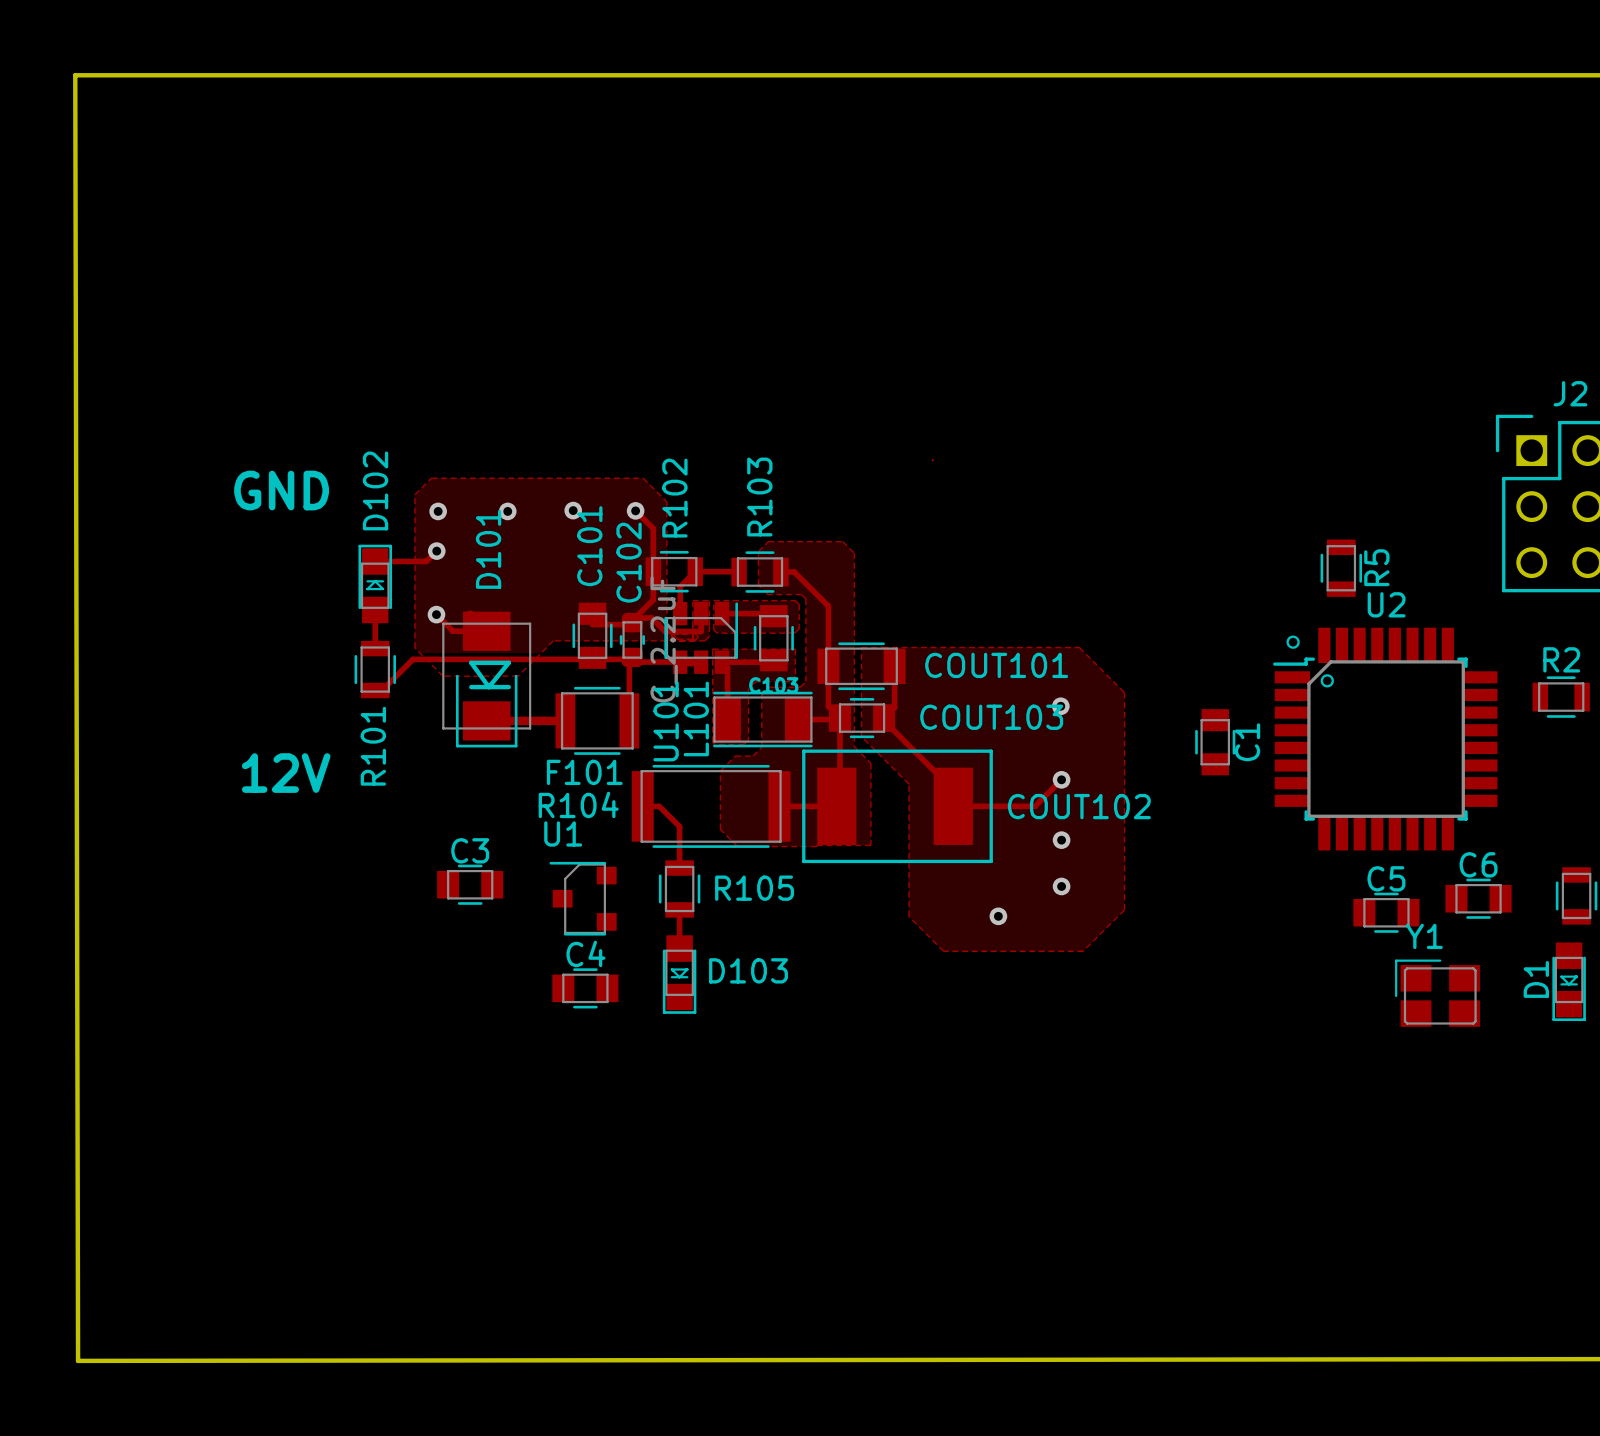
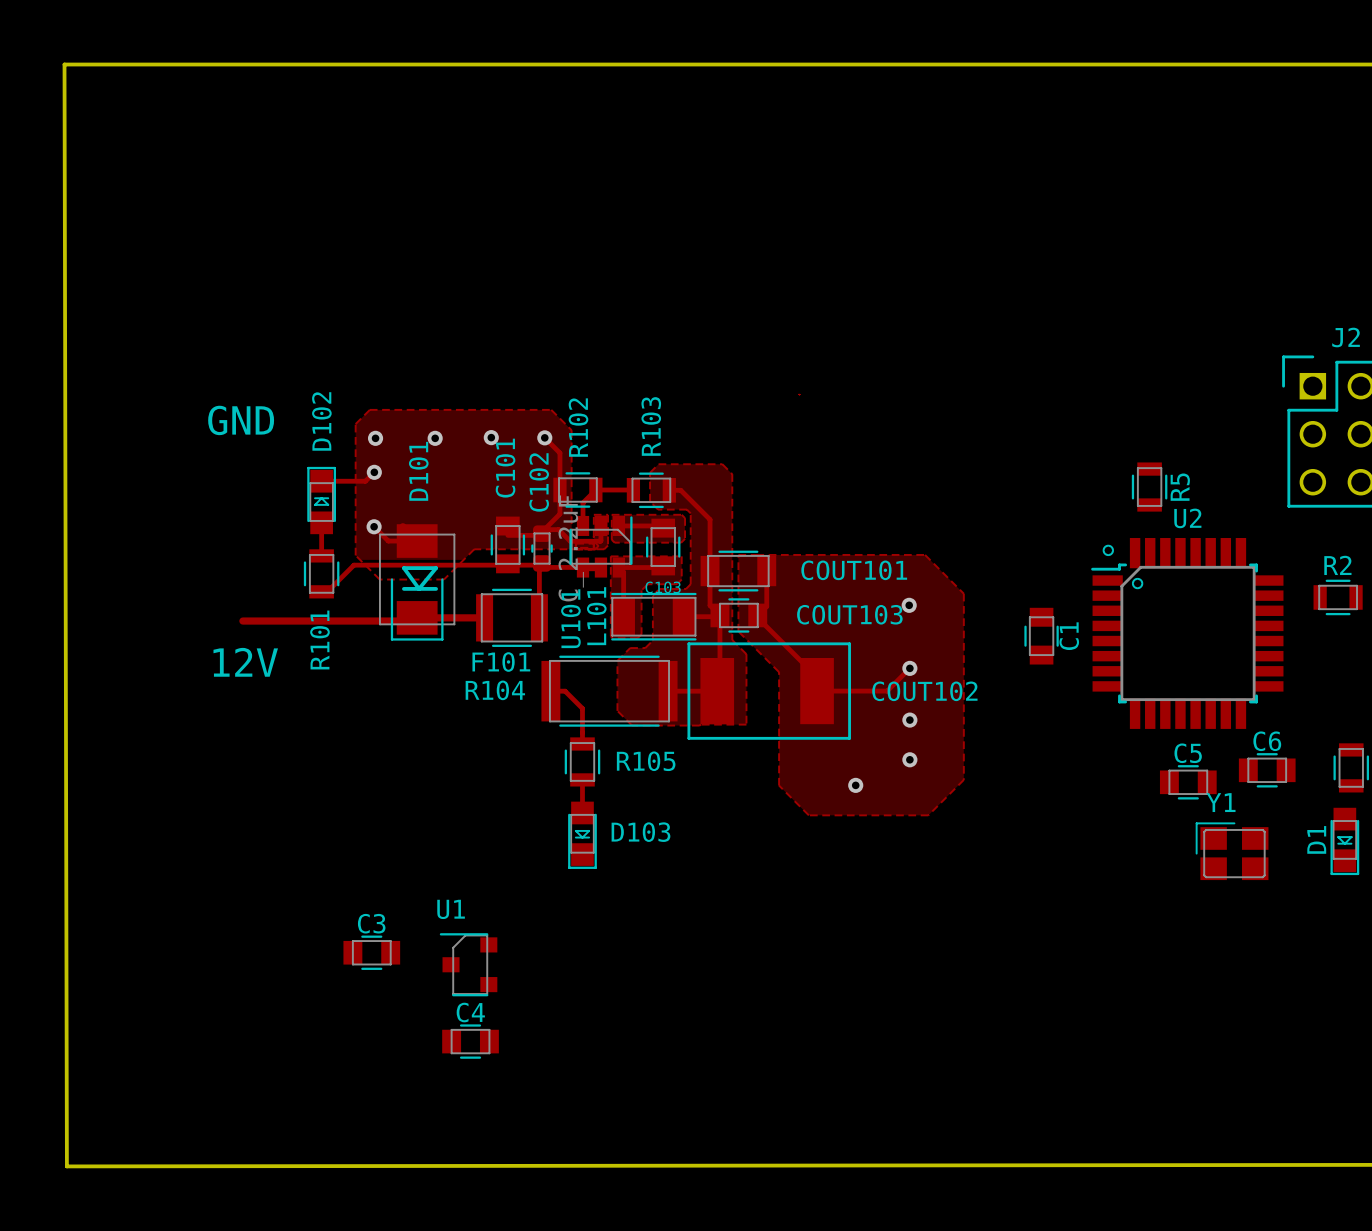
track: none -> (242, 621) (414, 621)
C3 position: (470, 884) -> (371, 952)
U1 position: (583, 898) -> (468, 964)
C4 position: (585, 988) -> (470, 1041)

